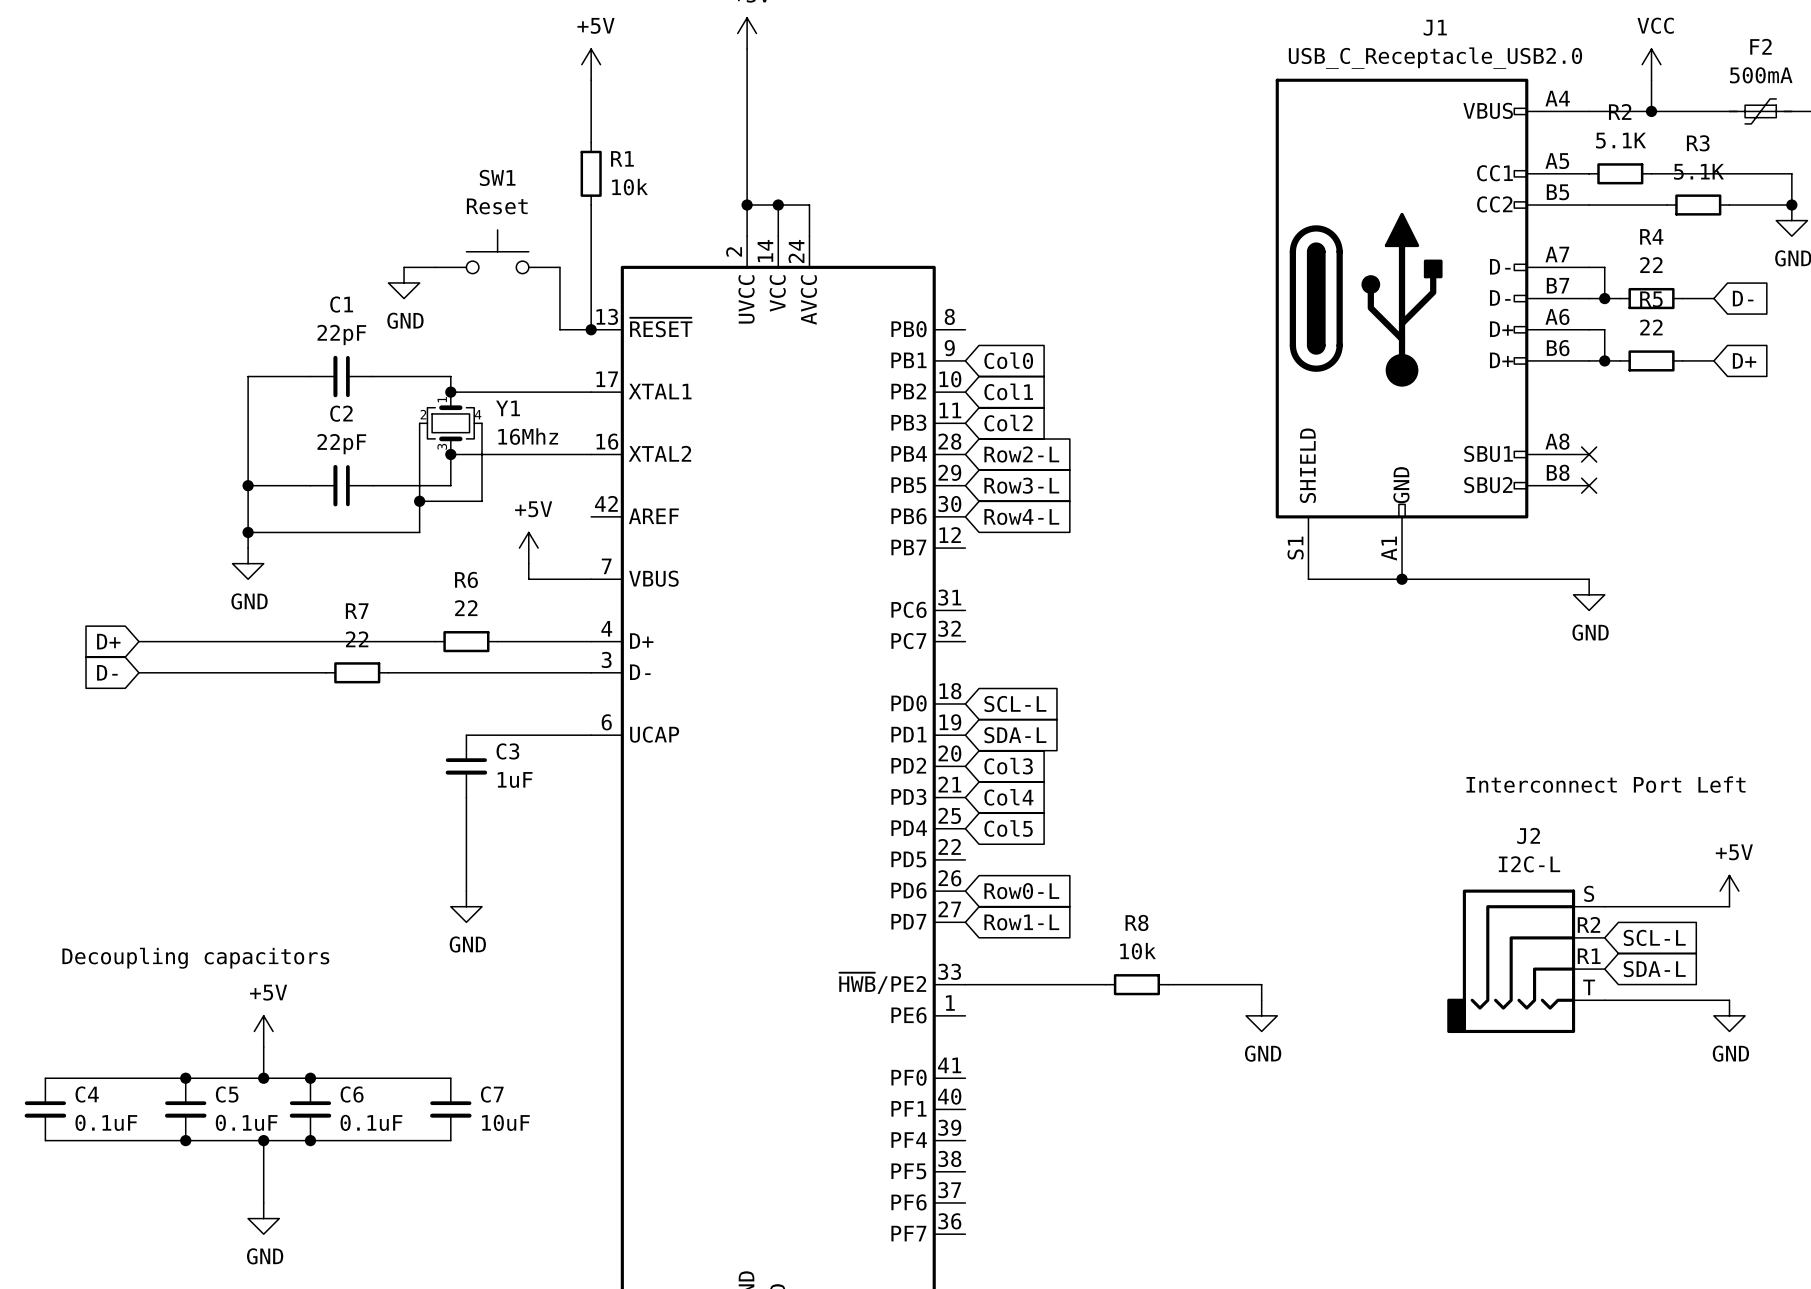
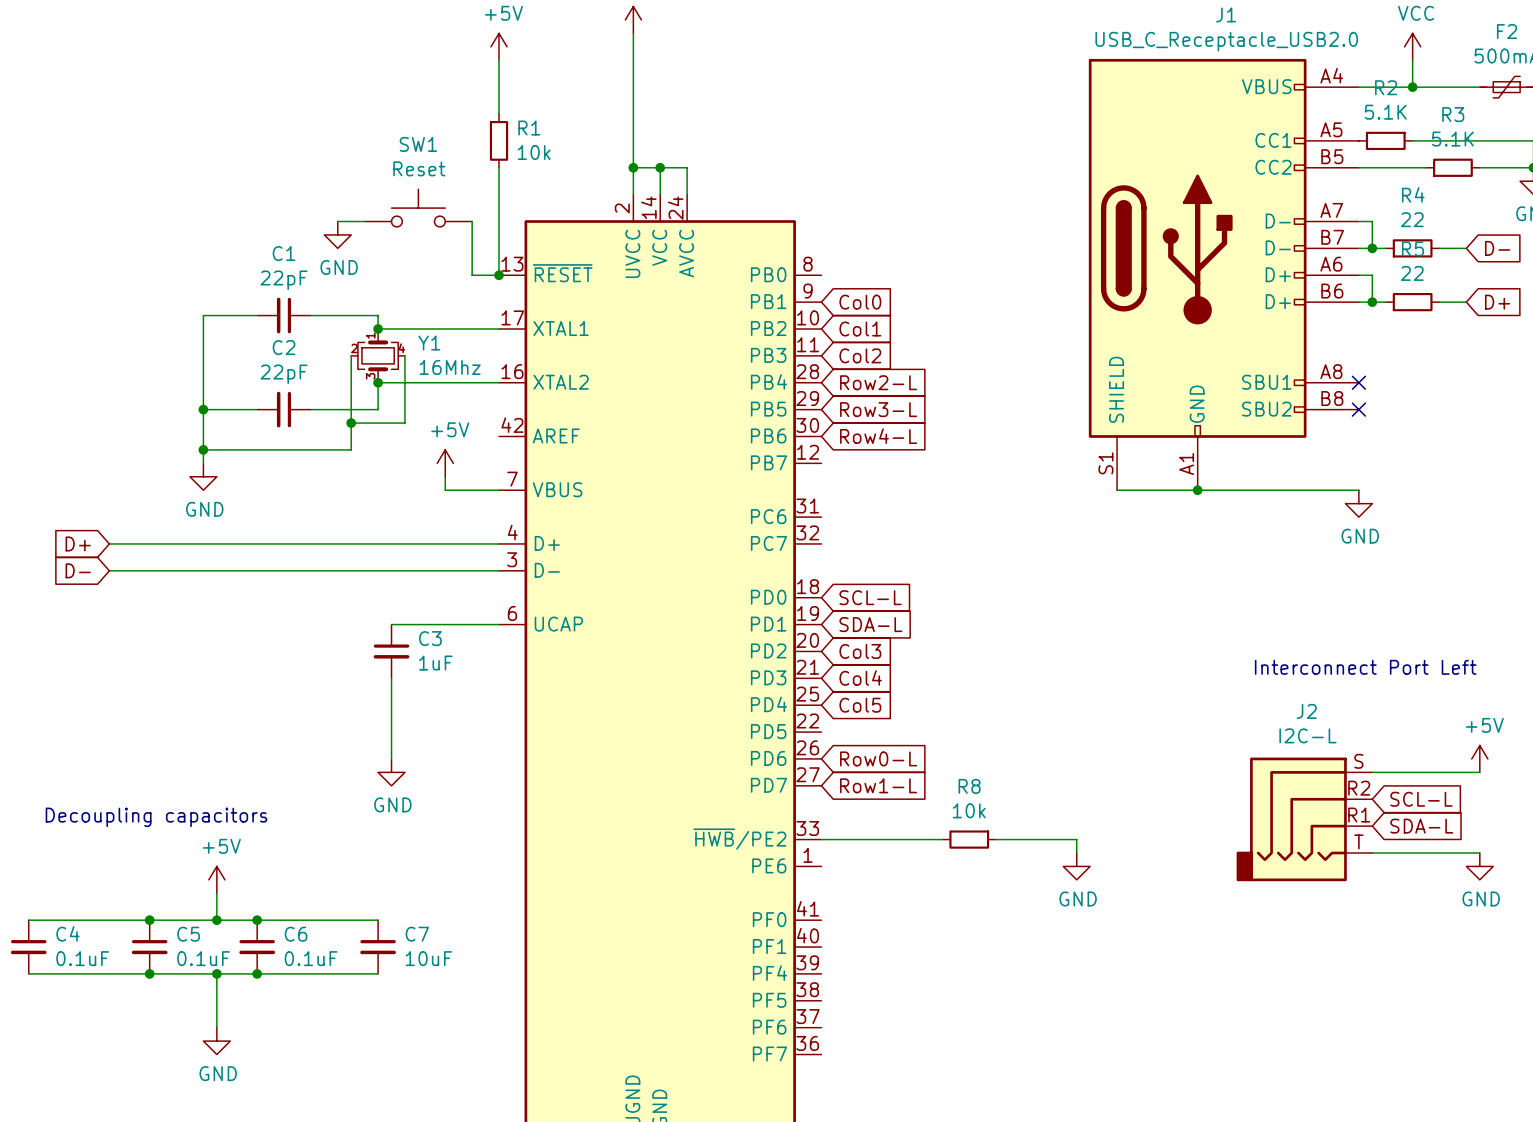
wire: none -> (364, 543) (418, 543)
R6: 22 (466, 641) -> none
wire: none -> (270, 570) (324, 570)
R7: 22 (357, 672) -> none

